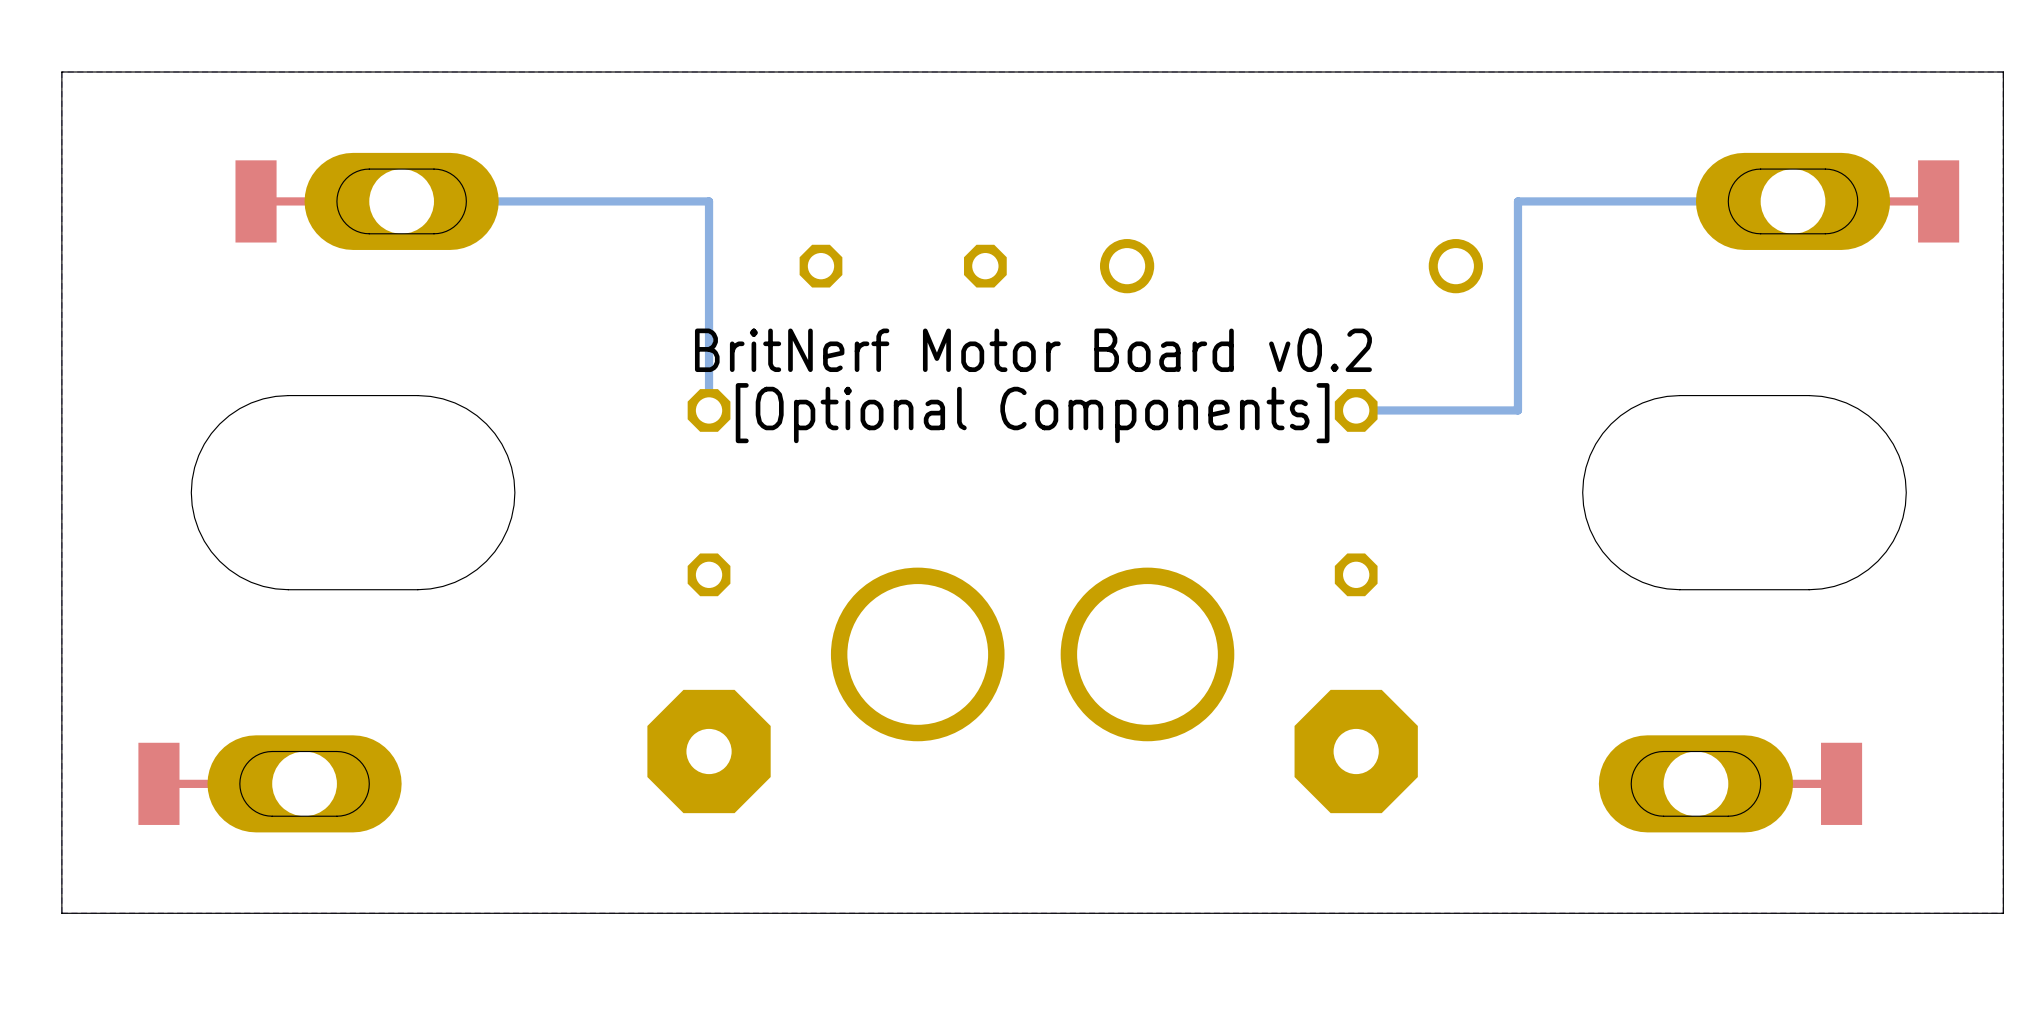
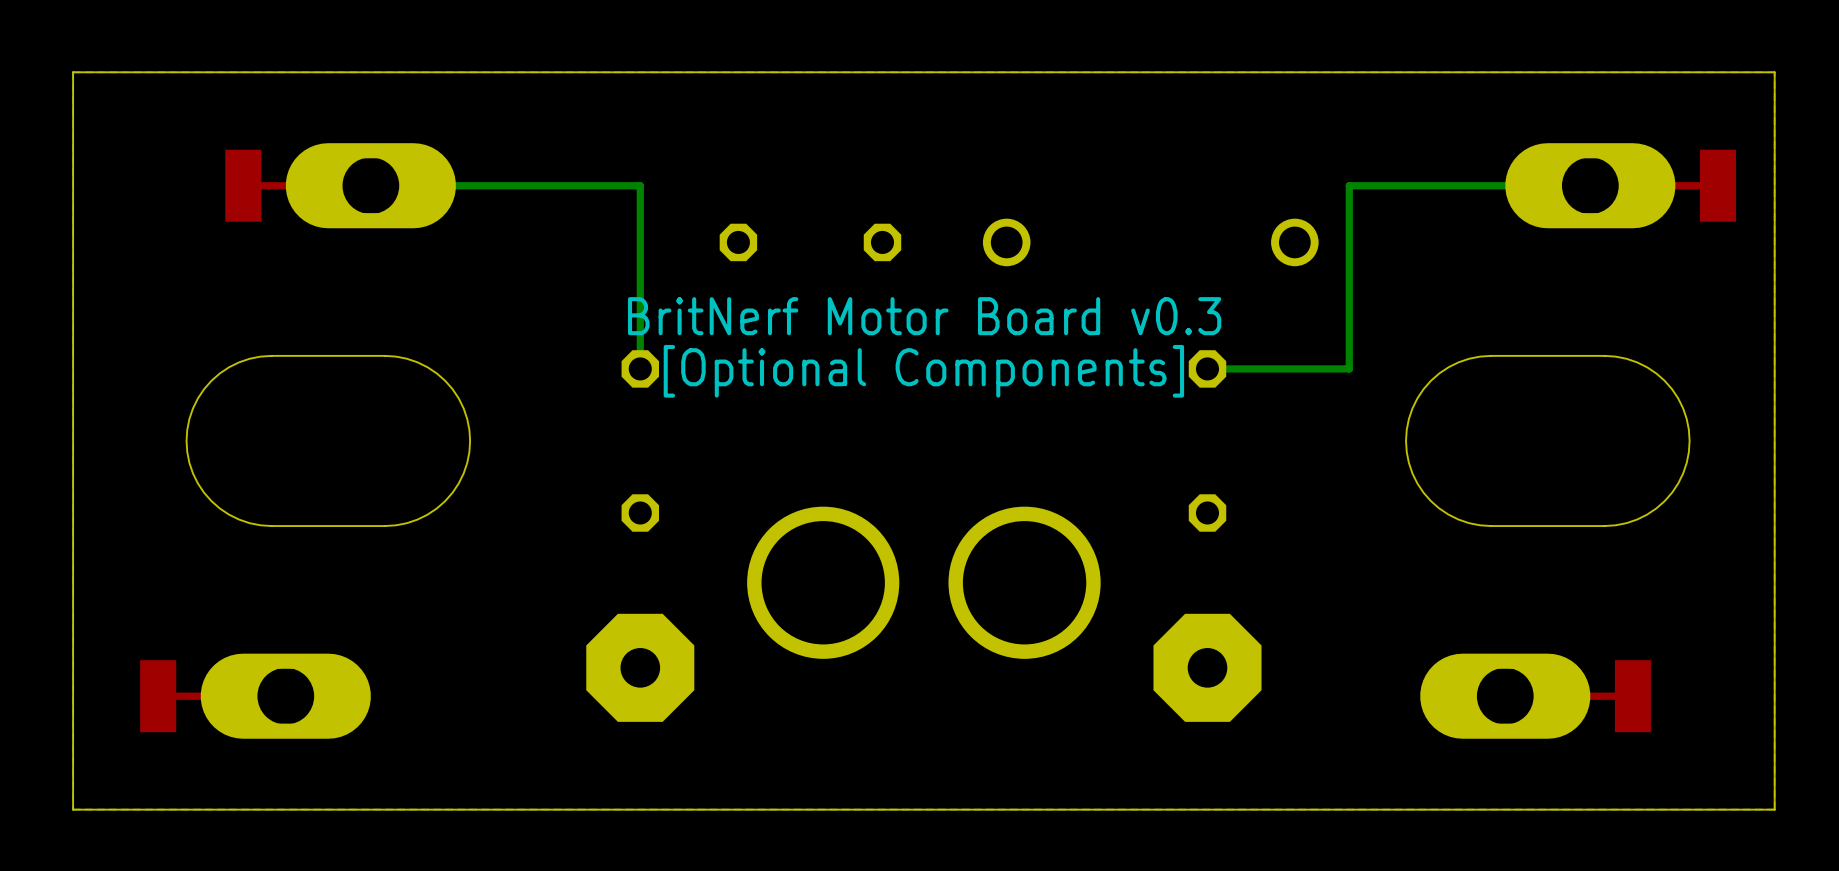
text: BritNerf Motor Board v0.2 (1033, 350) -> BritNerf Motor Board v0.3 (924, 316)

